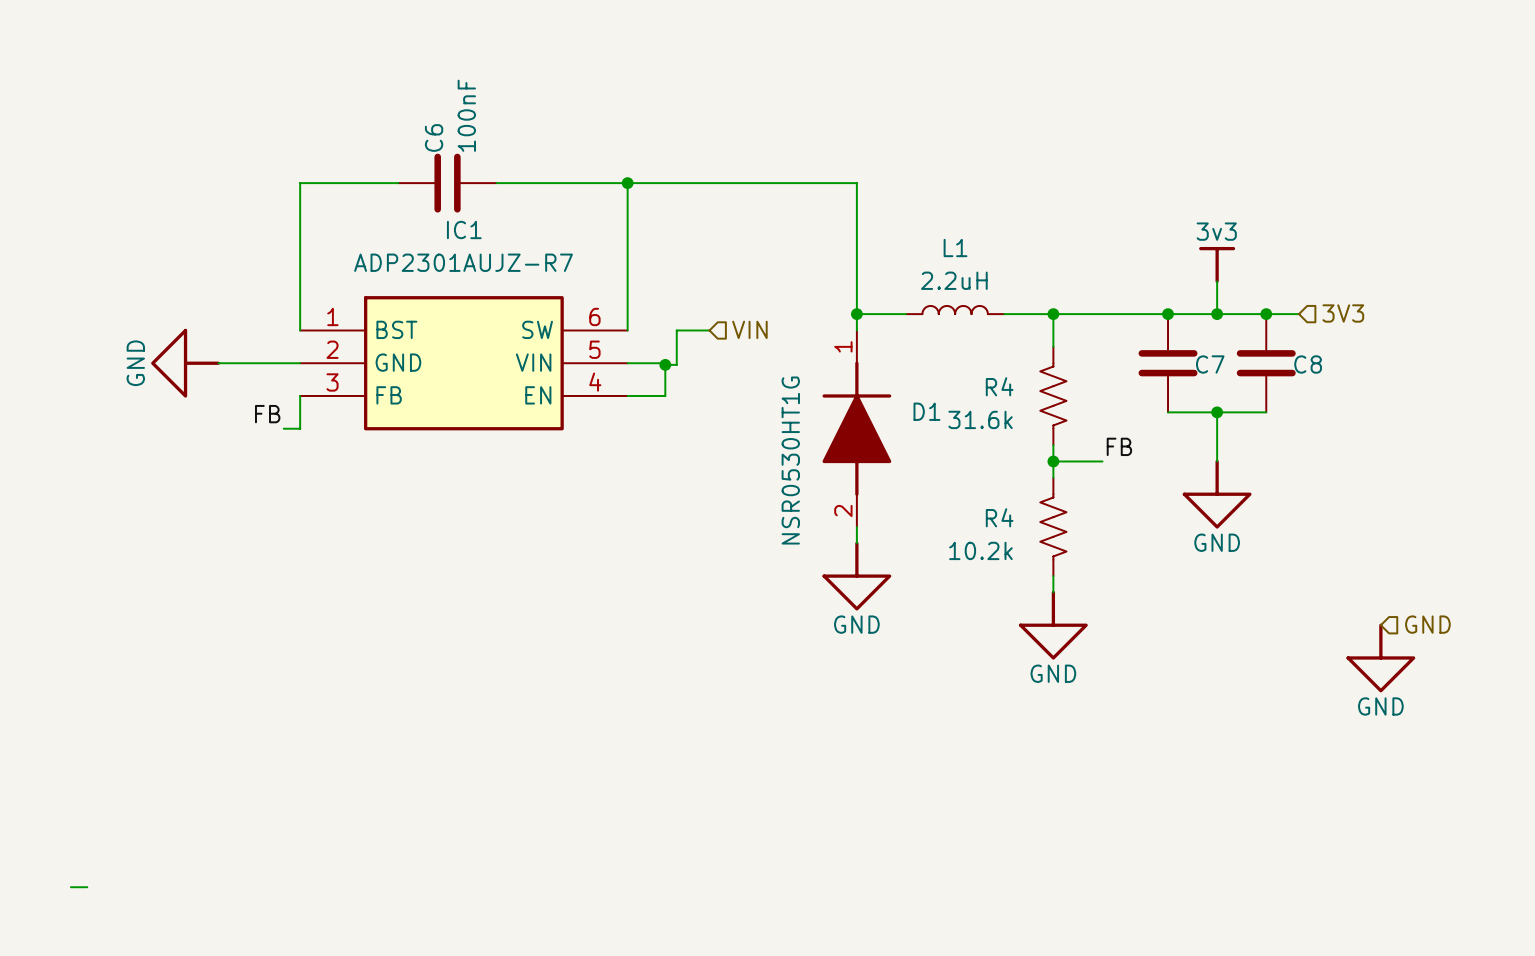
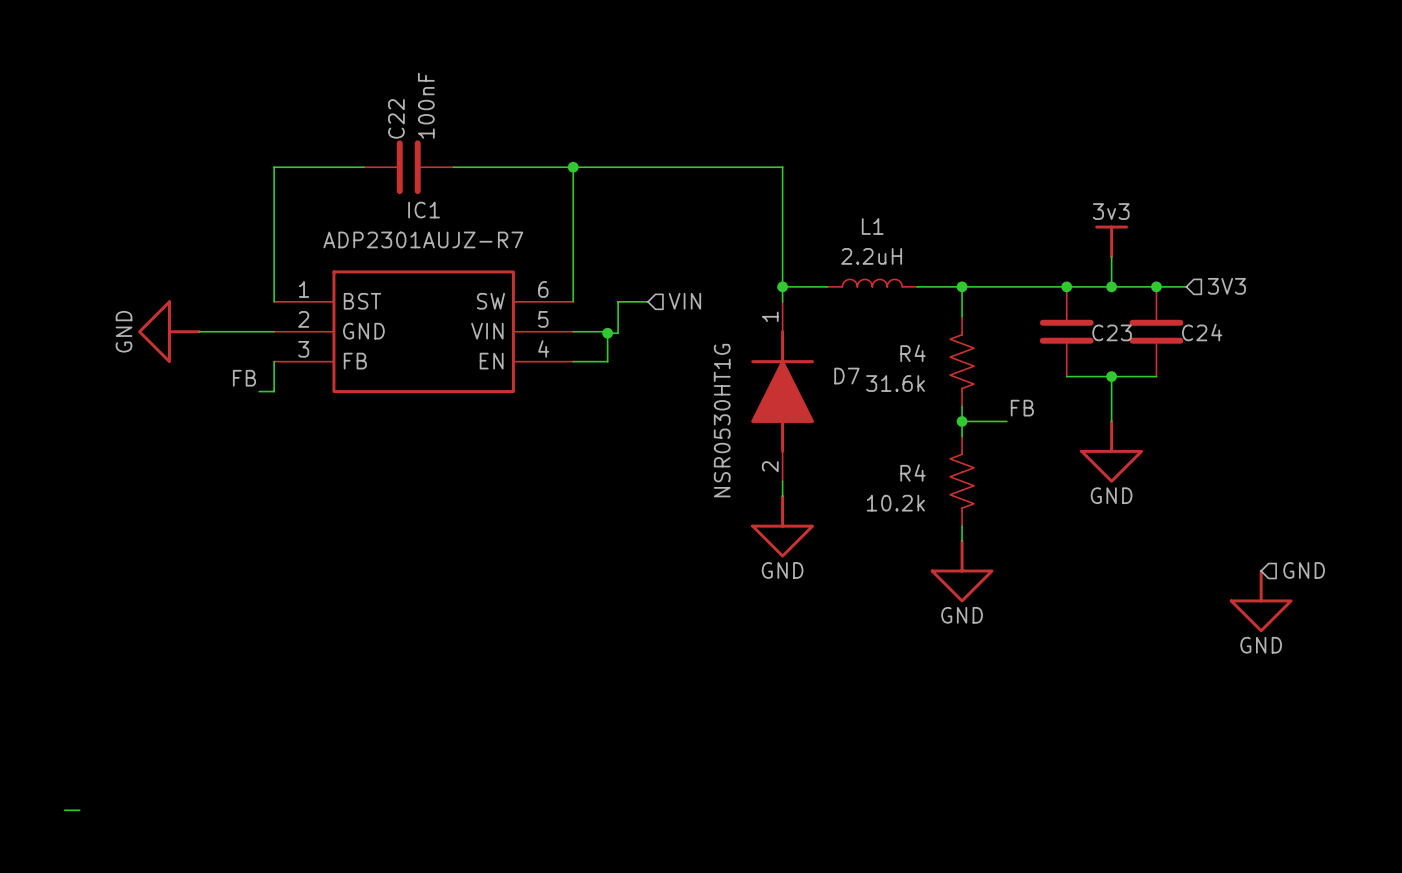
C6 name: C6 (434, 138) -> C22 (396, 118)
C7 name: C7 (1210, 364) -> C23 (1112, 332)
C8 name: C8 (1308, 364) -> C24 (1202, 332)
D1 name: D1 (926, 411) -> D7 (846, 376)

